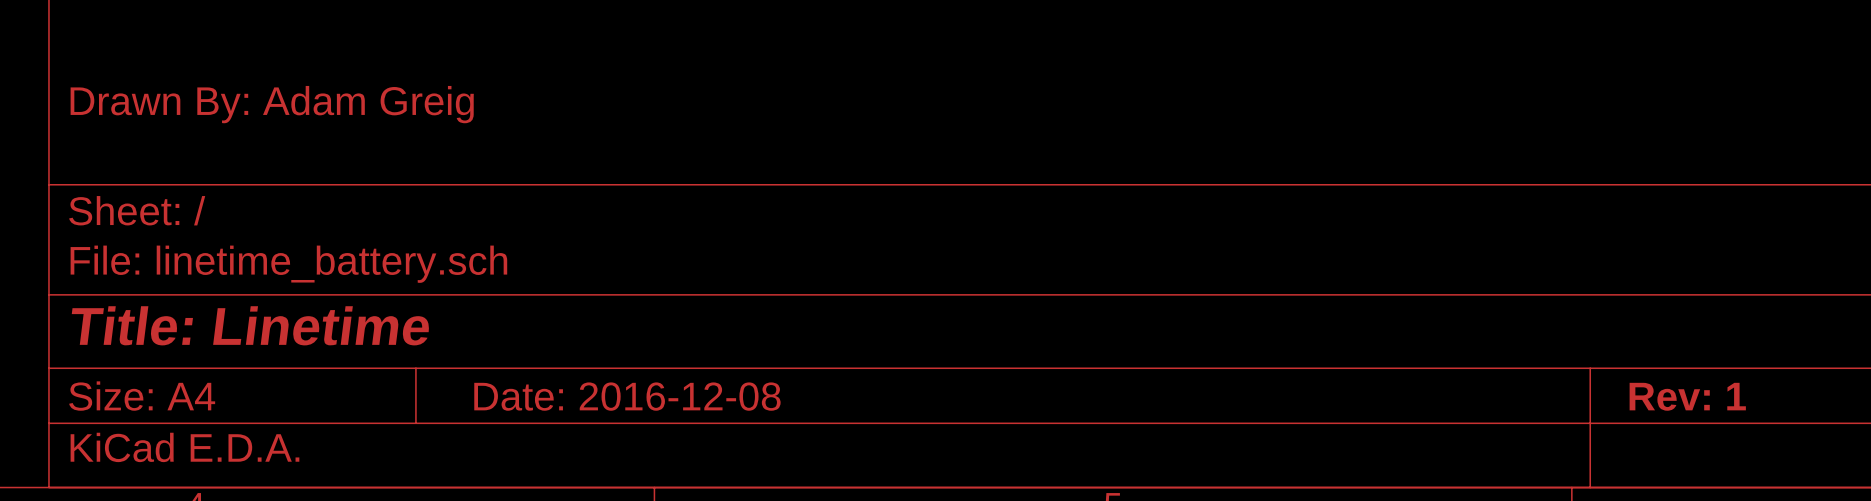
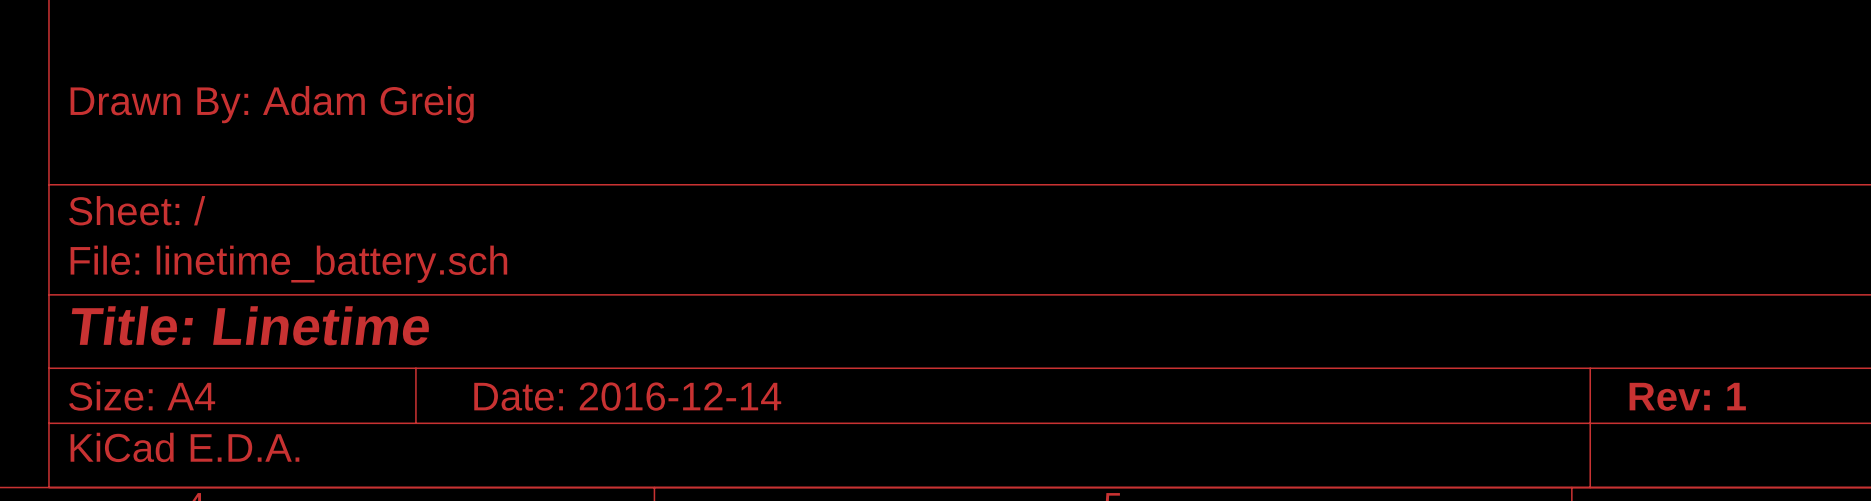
title block: Date: 2016-12-08 (627, 396) -> Date: 2016-12-14 (627, 396)

